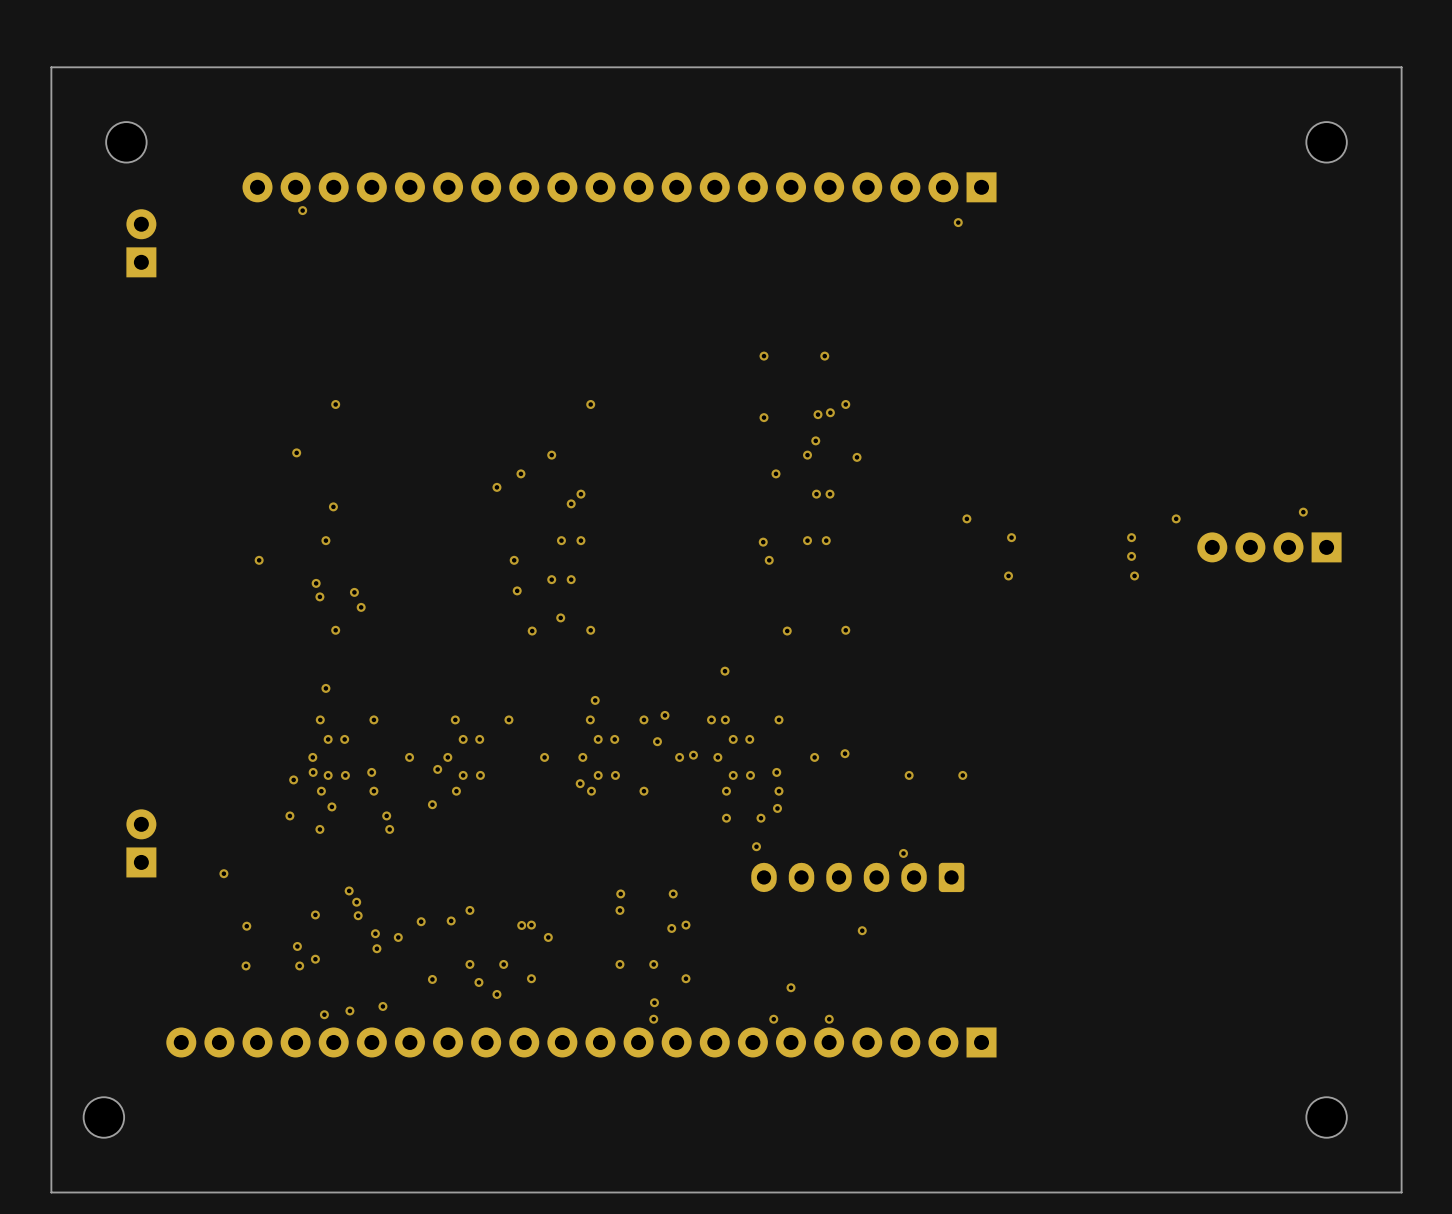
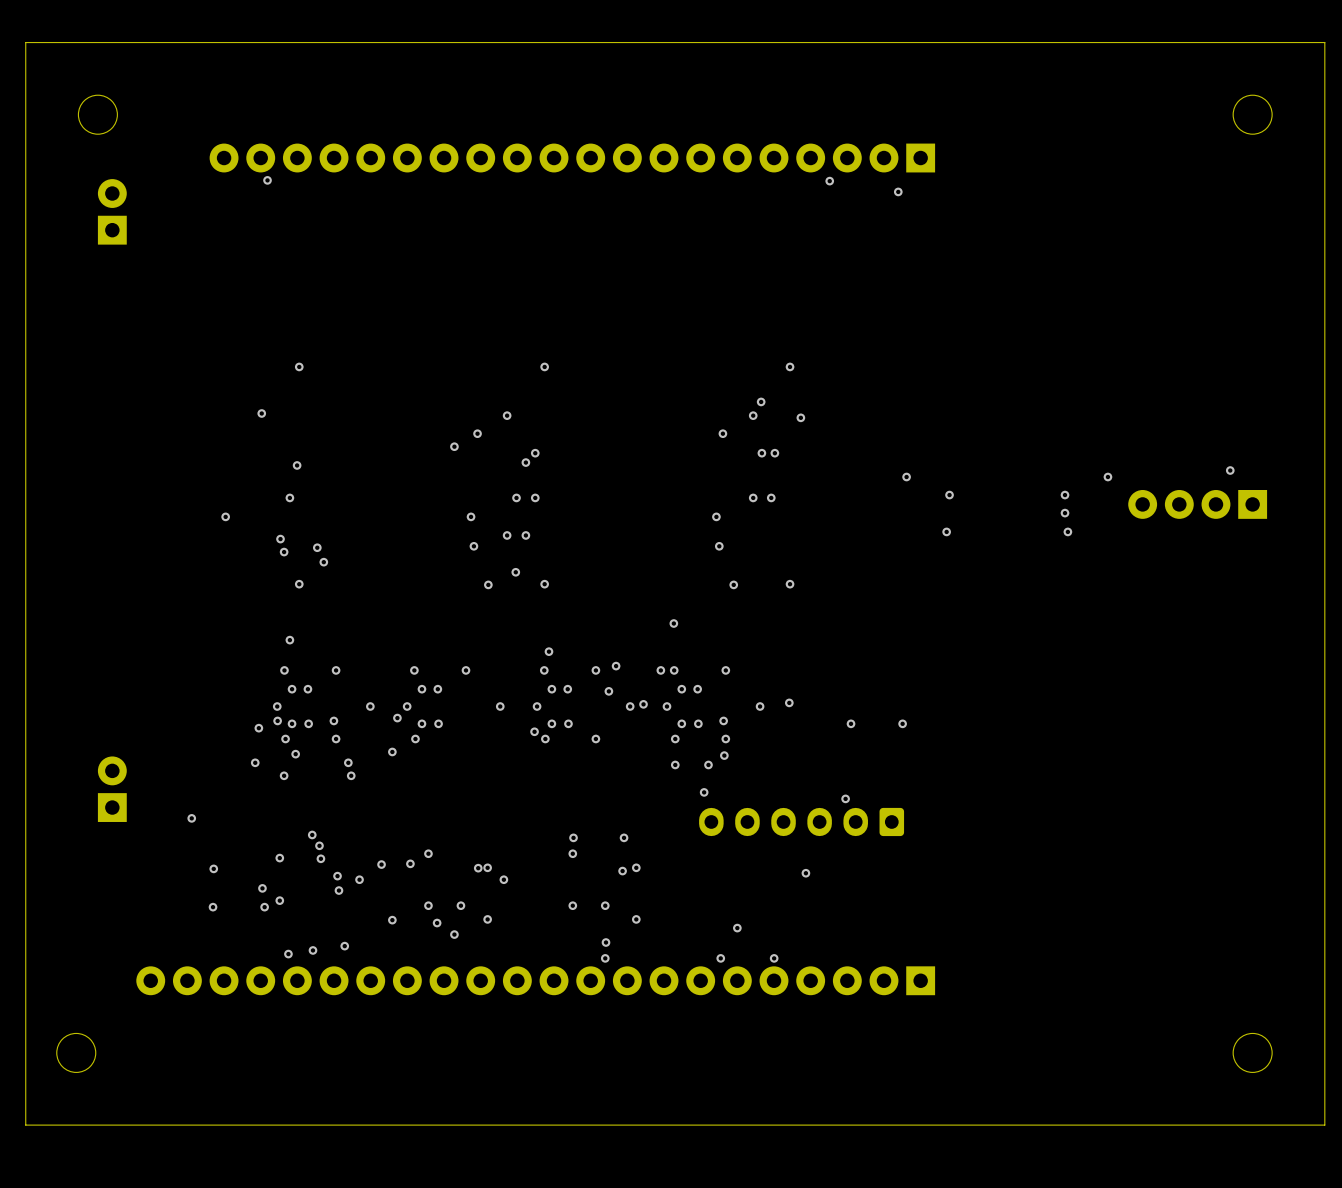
via: none -> (829, 181)
via: (763, 356) -> none
via: (824, 356) -> none
via: (830, 412) -> none
via: (818, 414) -> none
via: (763, 417) -> none
via position: (763, 542) -> (719, 546)

